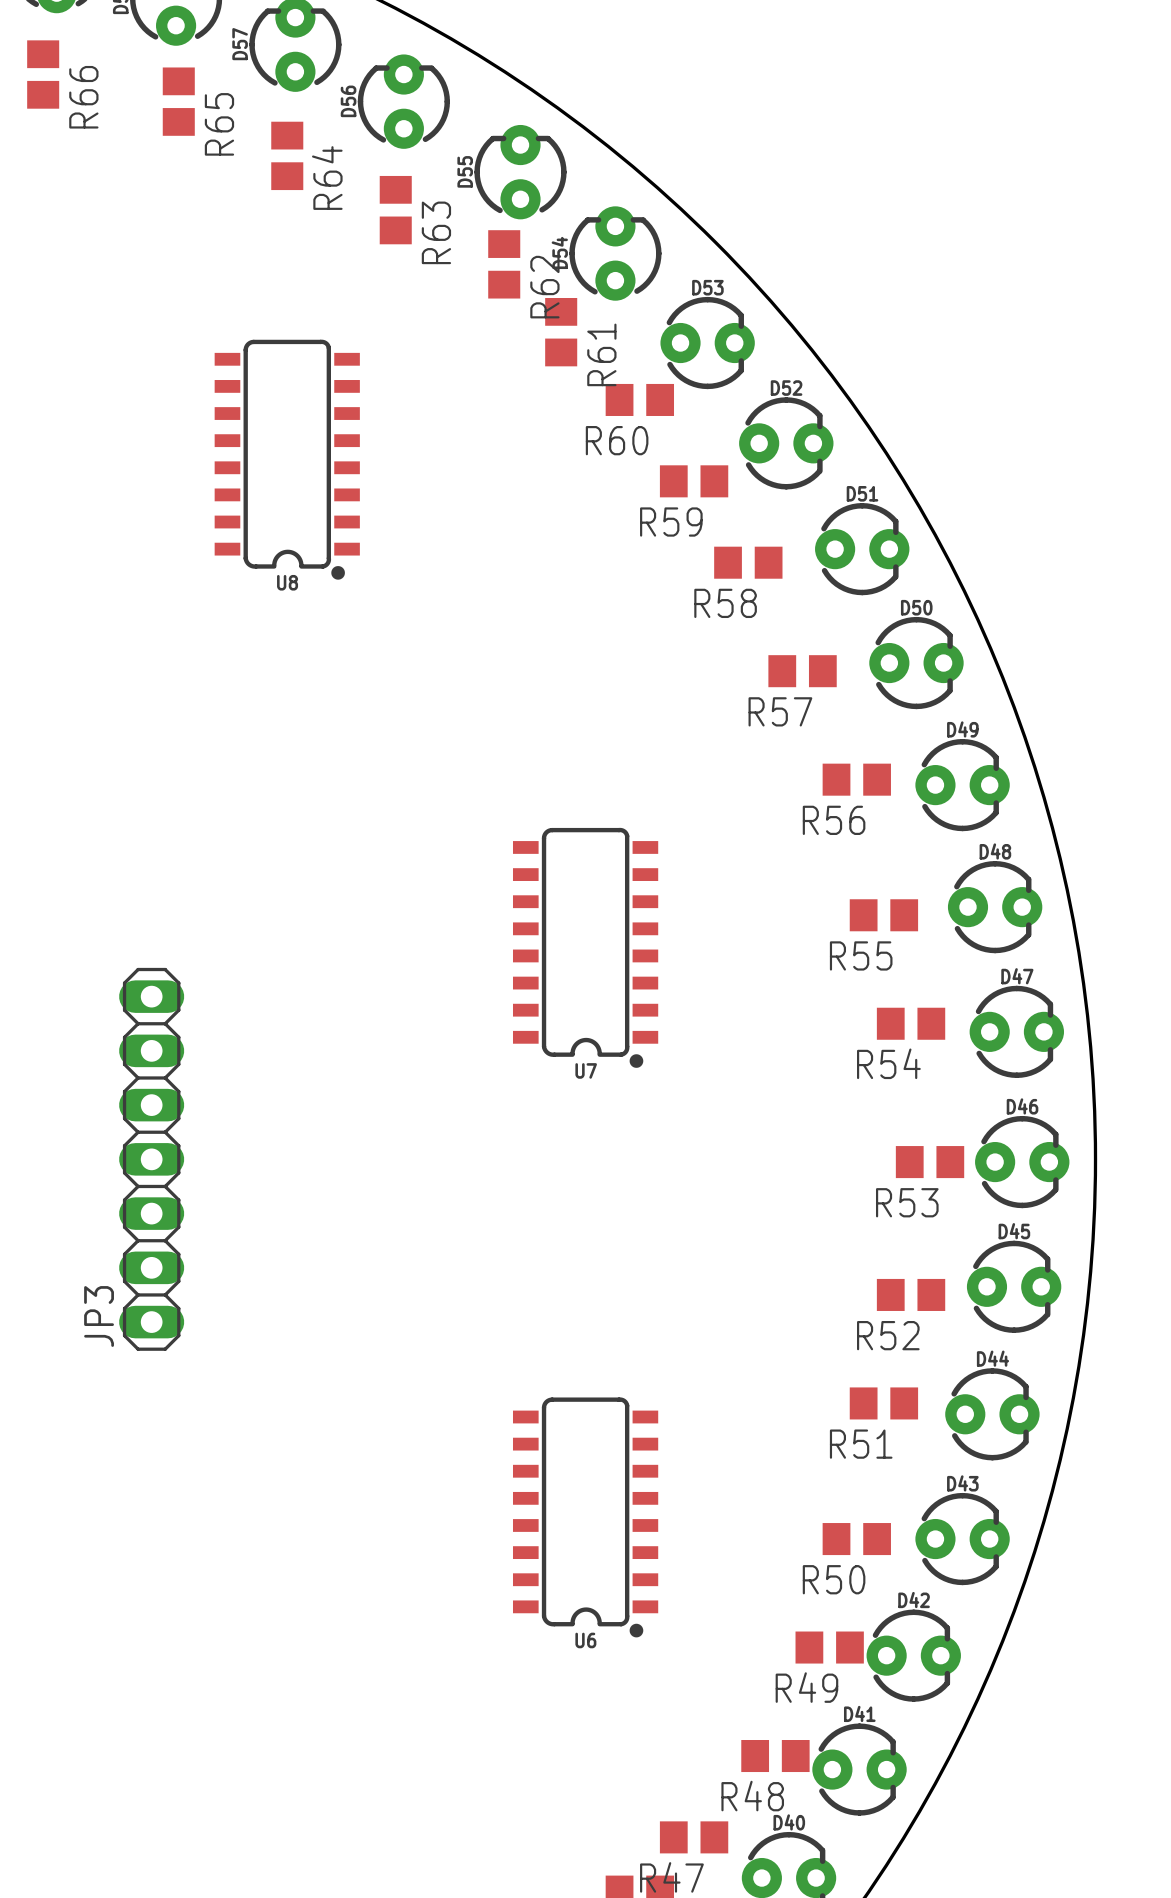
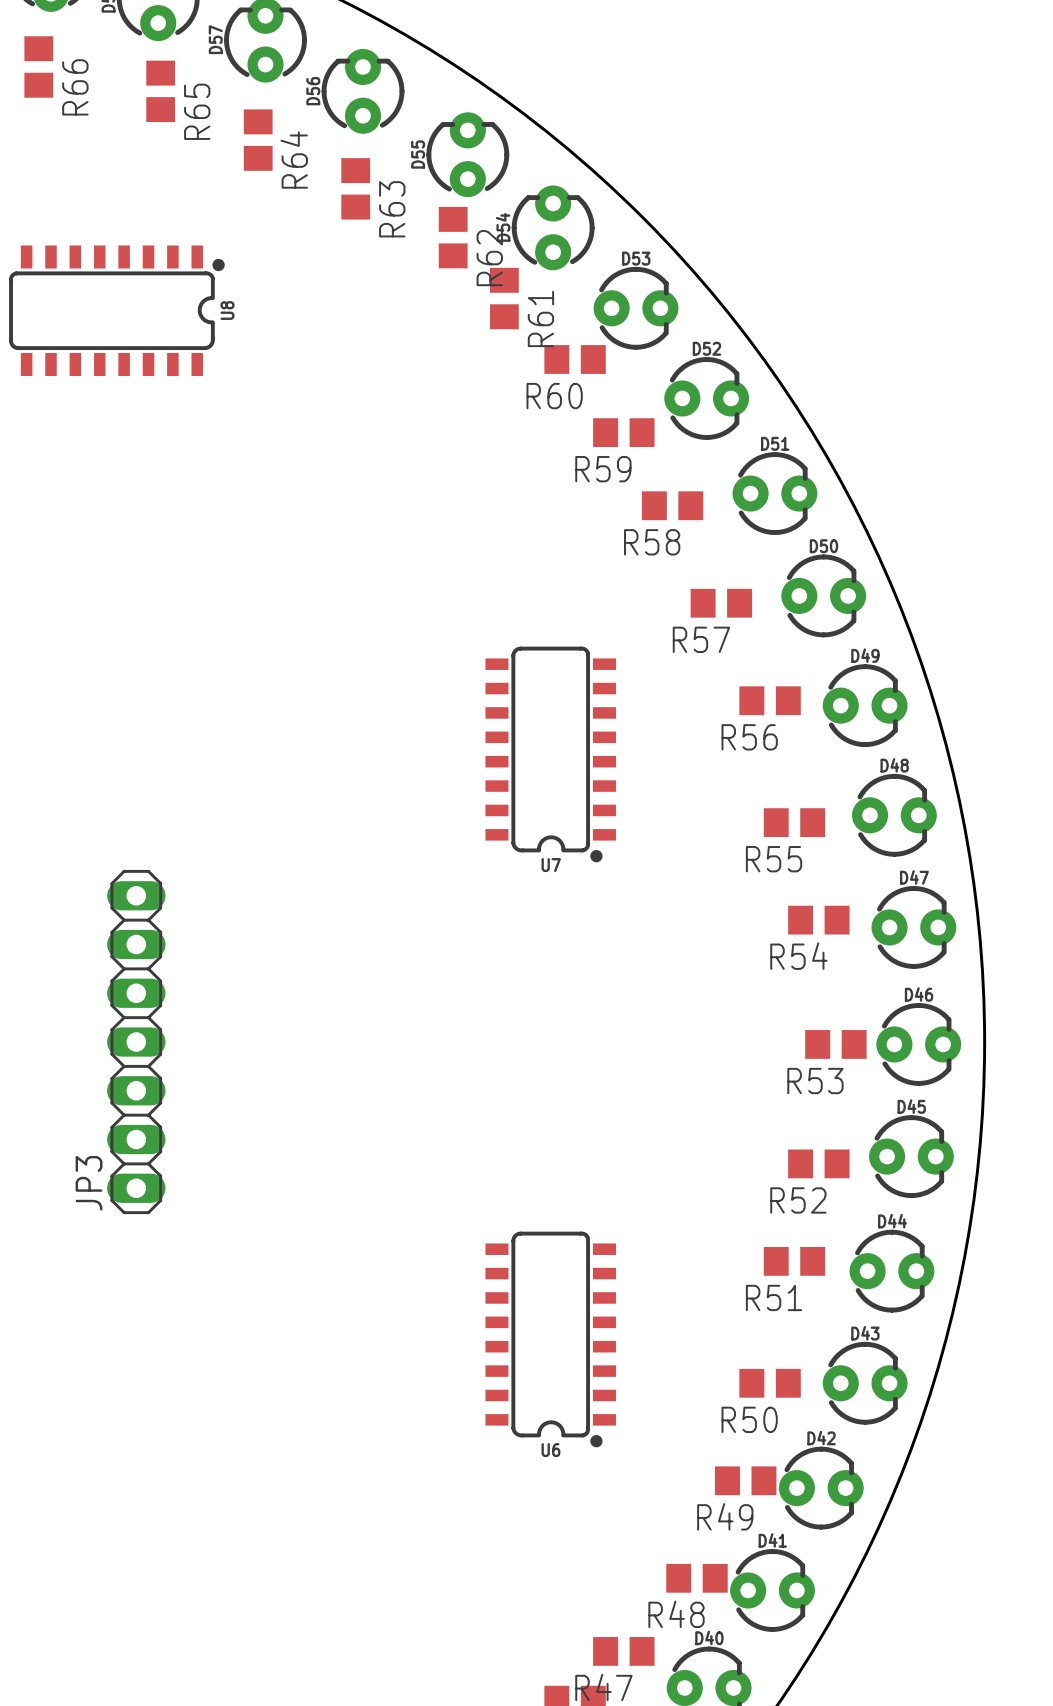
U8 rotation: 0° (287, 459) -> 90° counterclockwise (116, 310)
U8 position: (287, 459) -> (116, 310)
U7 position: (585, 947) -> (550, 754)
U6 position: (585, 1517) -> (550, 1339)

